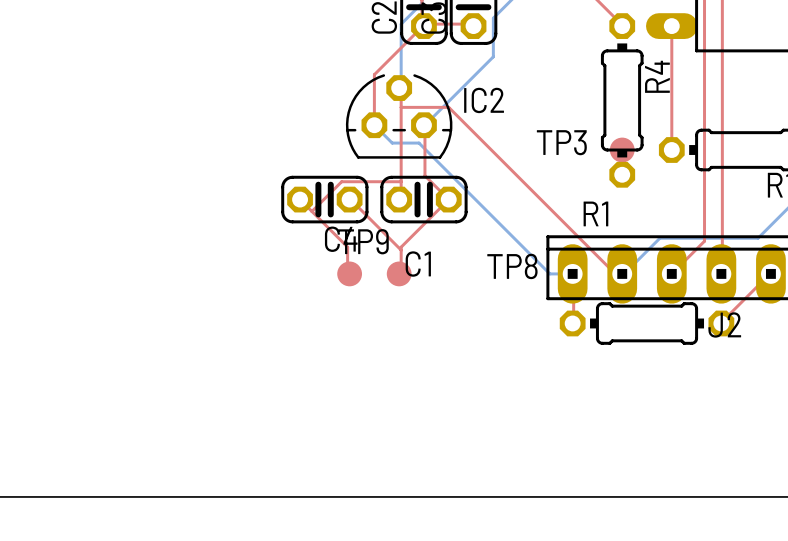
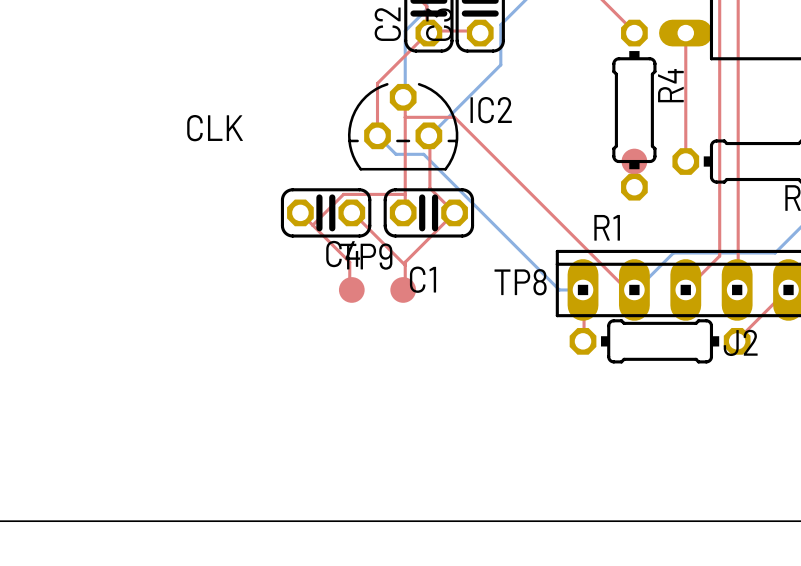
TP3 name: TP3 (561, 142) -> CLK (215, 128)

